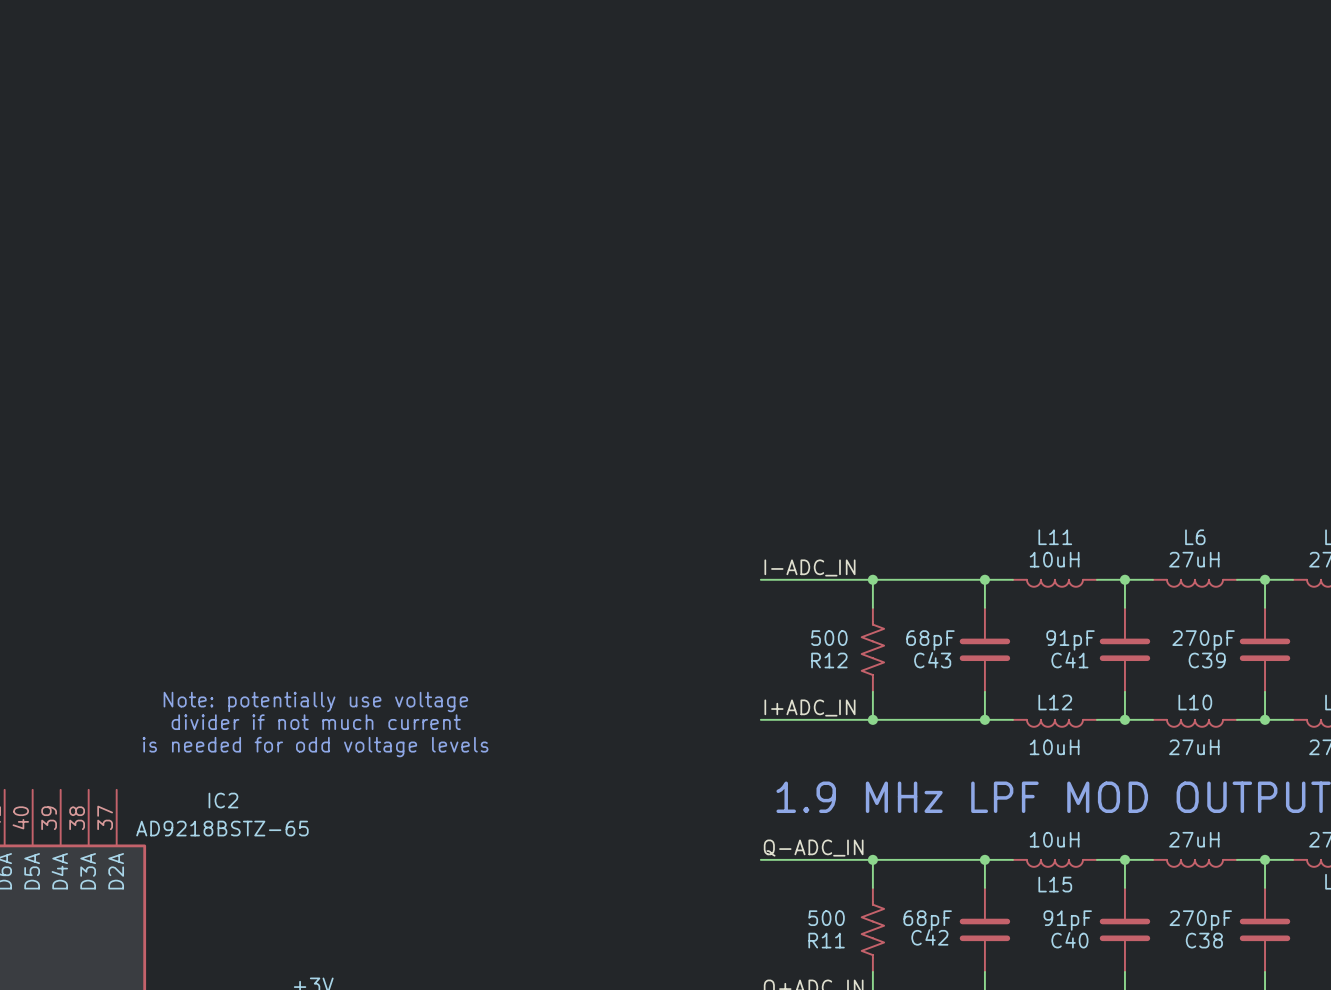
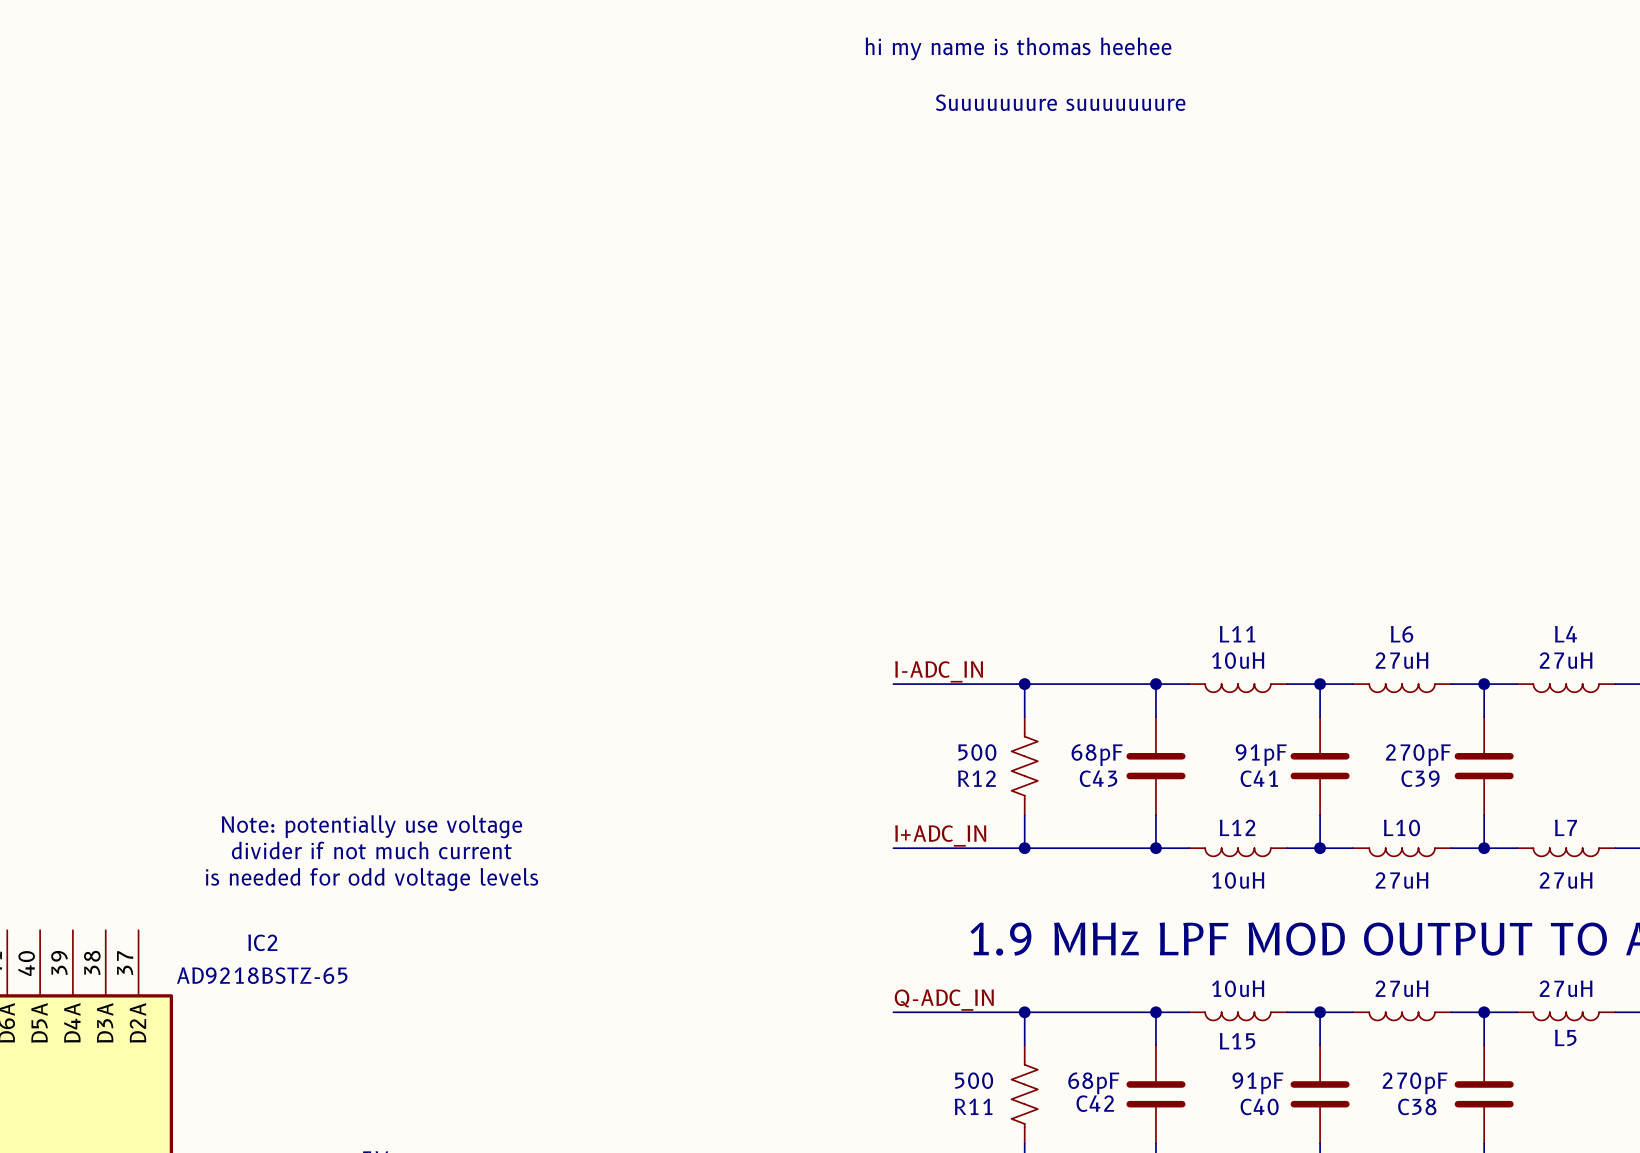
text: none -> hi my name is thomas heehee (1018, 48)
text: none -> Suuuuuuure suuuuuuure (1060, 102)

